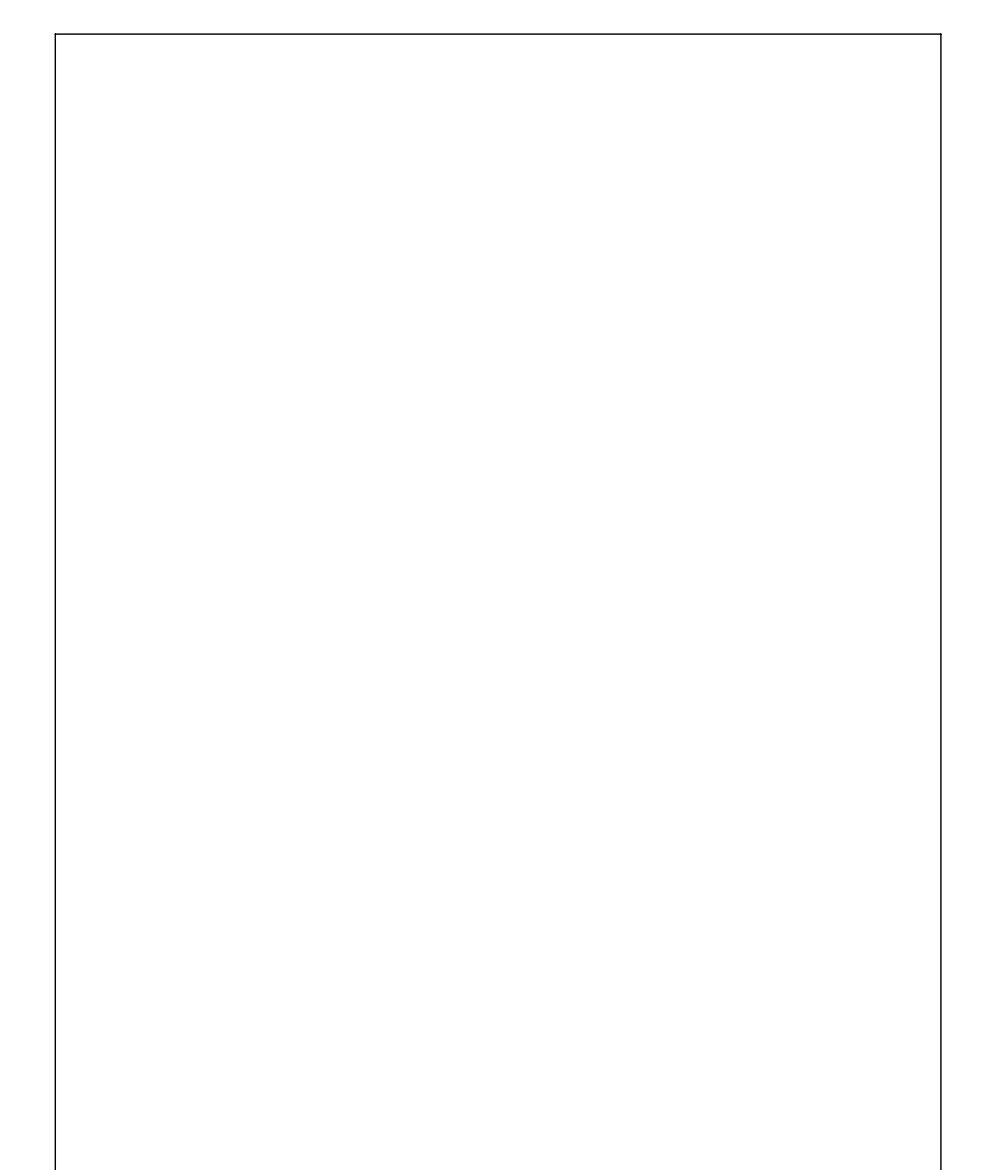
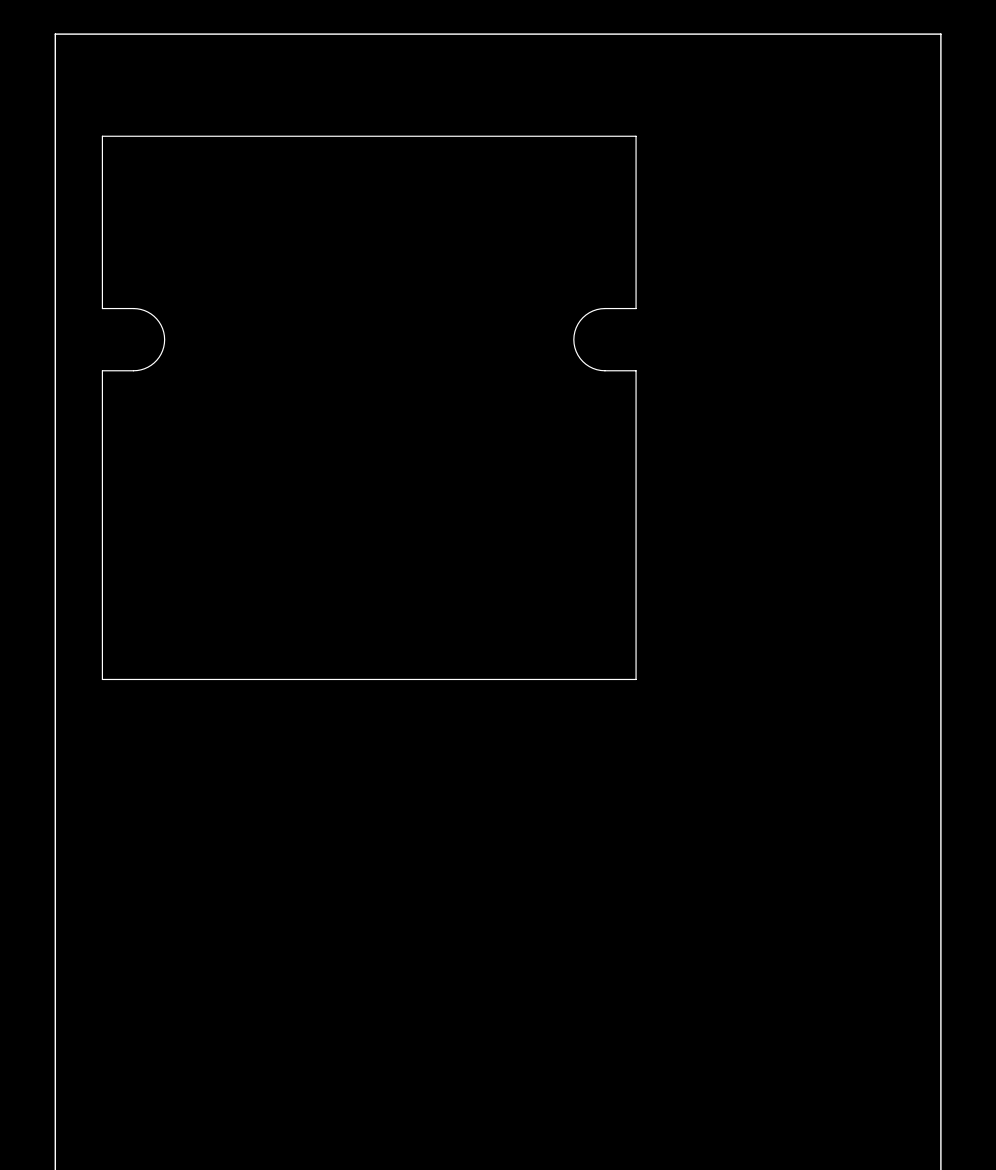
board edge: none -> (102, 136) (102, 308) (137, 308) (147, 312) (159, 321) (164, 339) (159, 357) (147, 367) (137, 370) (102, 370) (102, 679) (636, 679) (636, 370) (600, 370) (589, 366) (578, 355) (573, 339) (578, 324) (589, 312) (600, 308) (636, 308) (636, 136) (102, 136)

